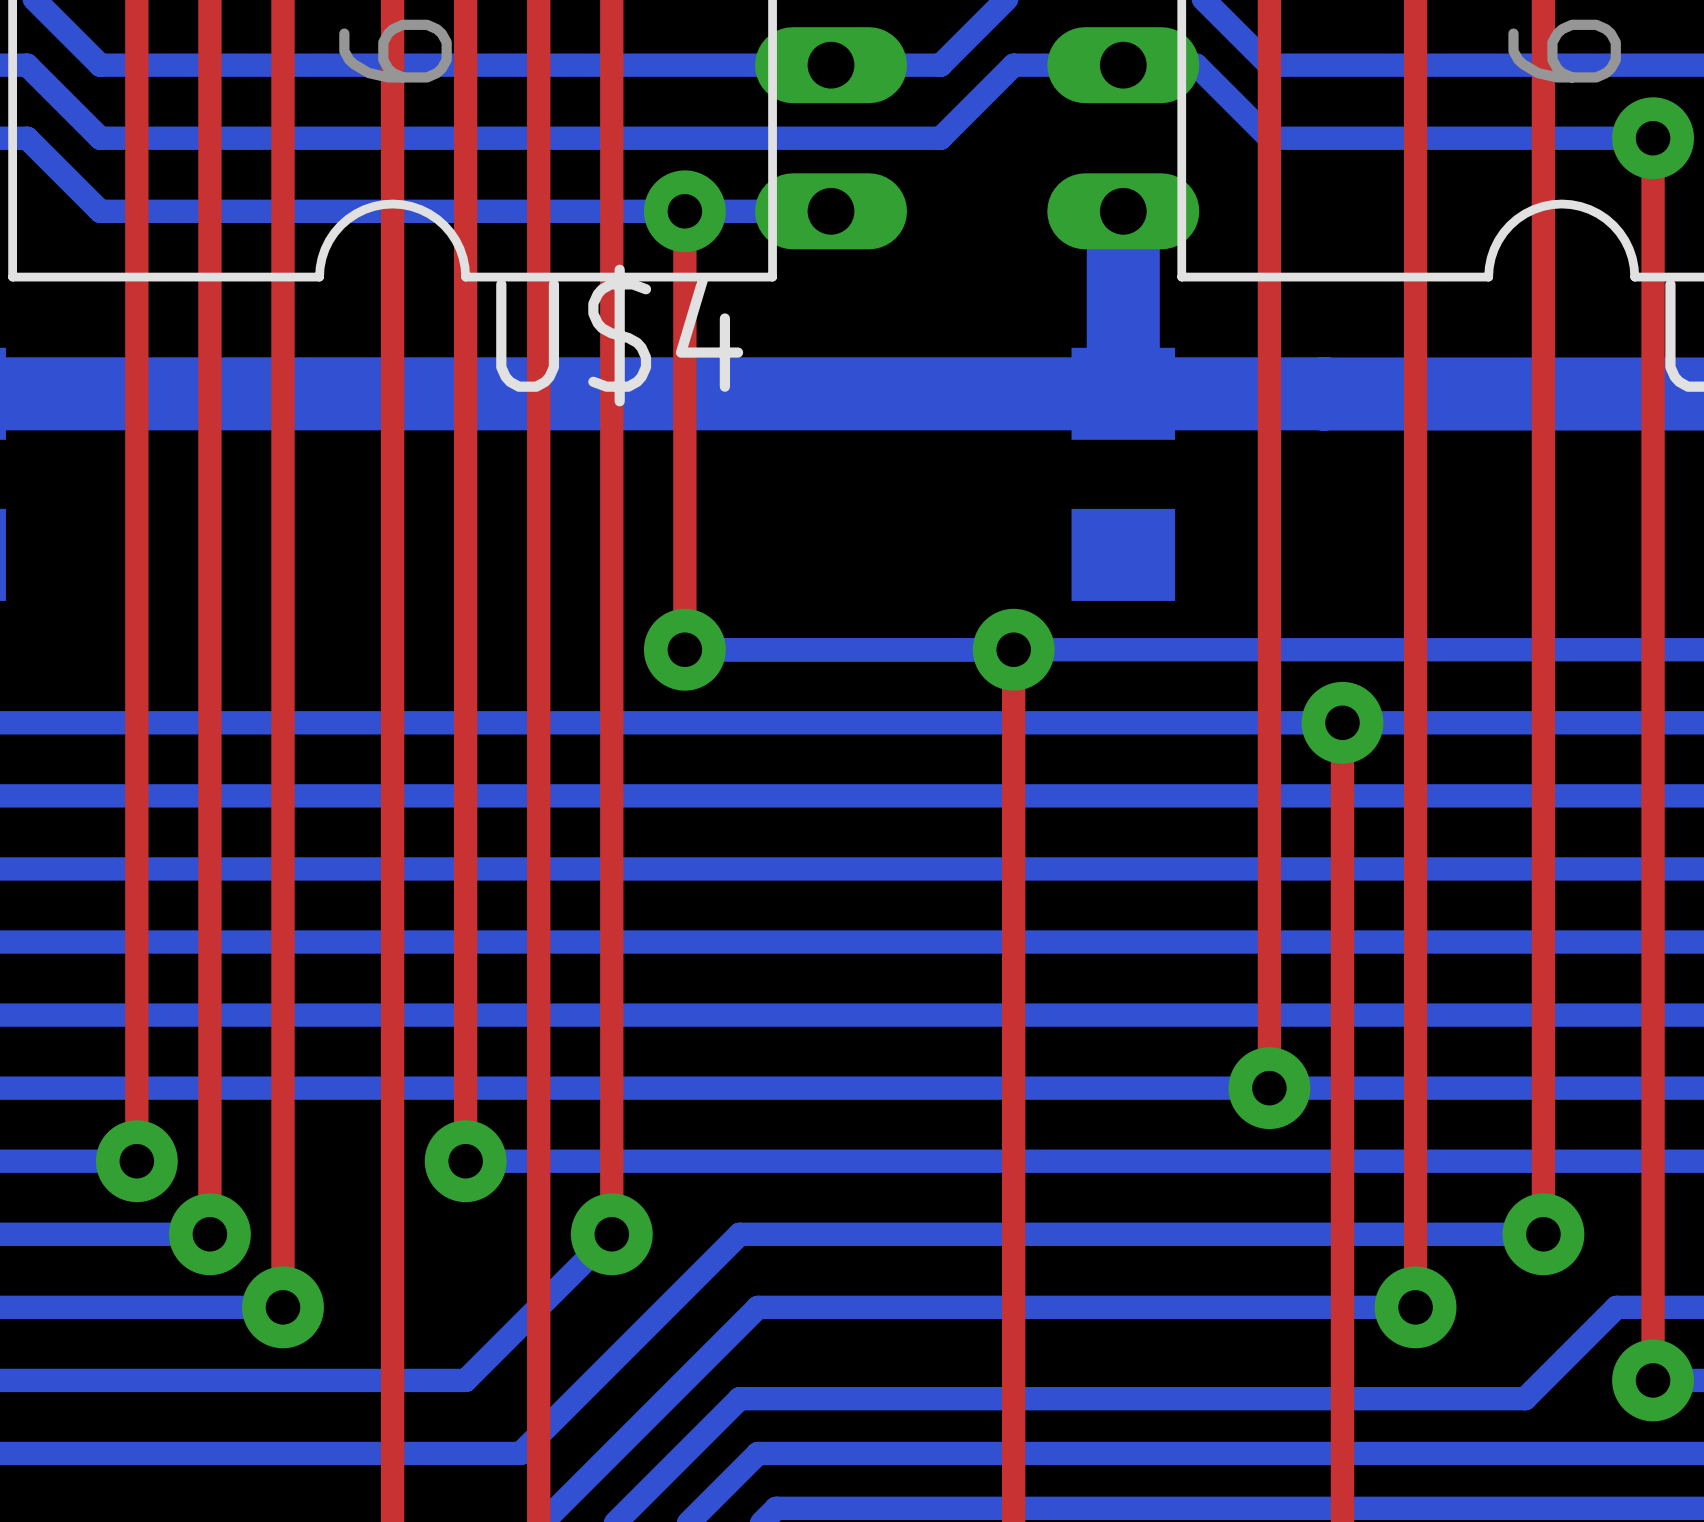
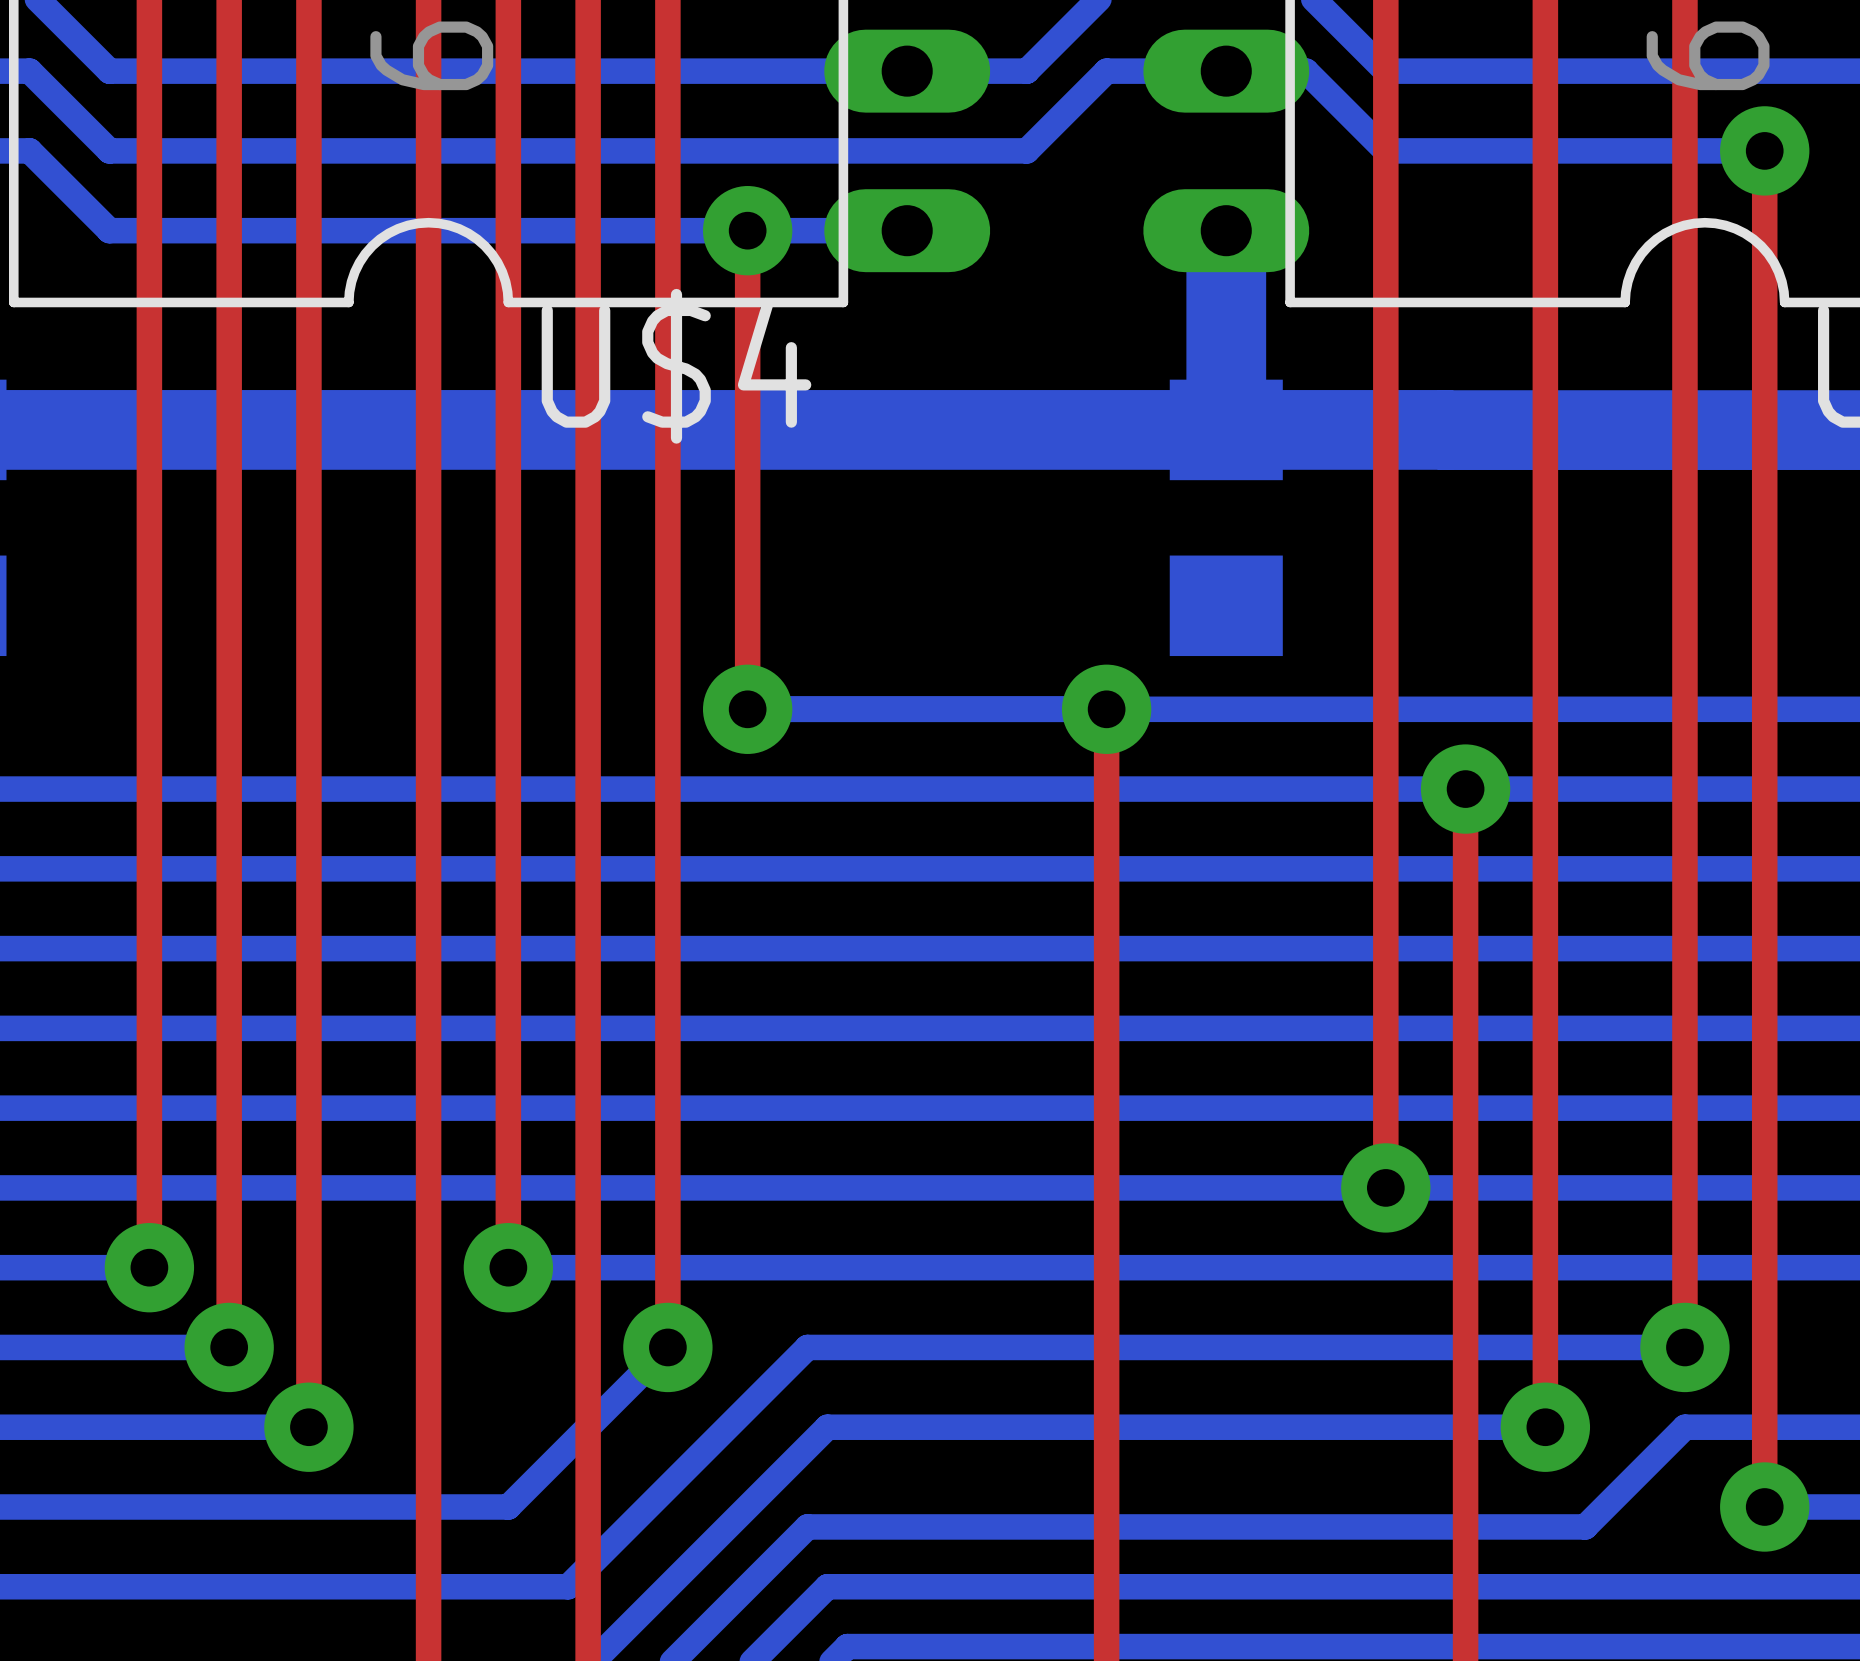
top track: (1653, 138) (1653, 1380) -> (1764, 150) (1764, 1506)
via position: (1653, 138) -> (1764, 150)
bottom track: (1616, 1307) (1525, 1398) (1452, 1398) -> (1764, 1427) (1684, 1427) (1585, 1526)
via position: (1653, 1380) -> (1764, 1506)

